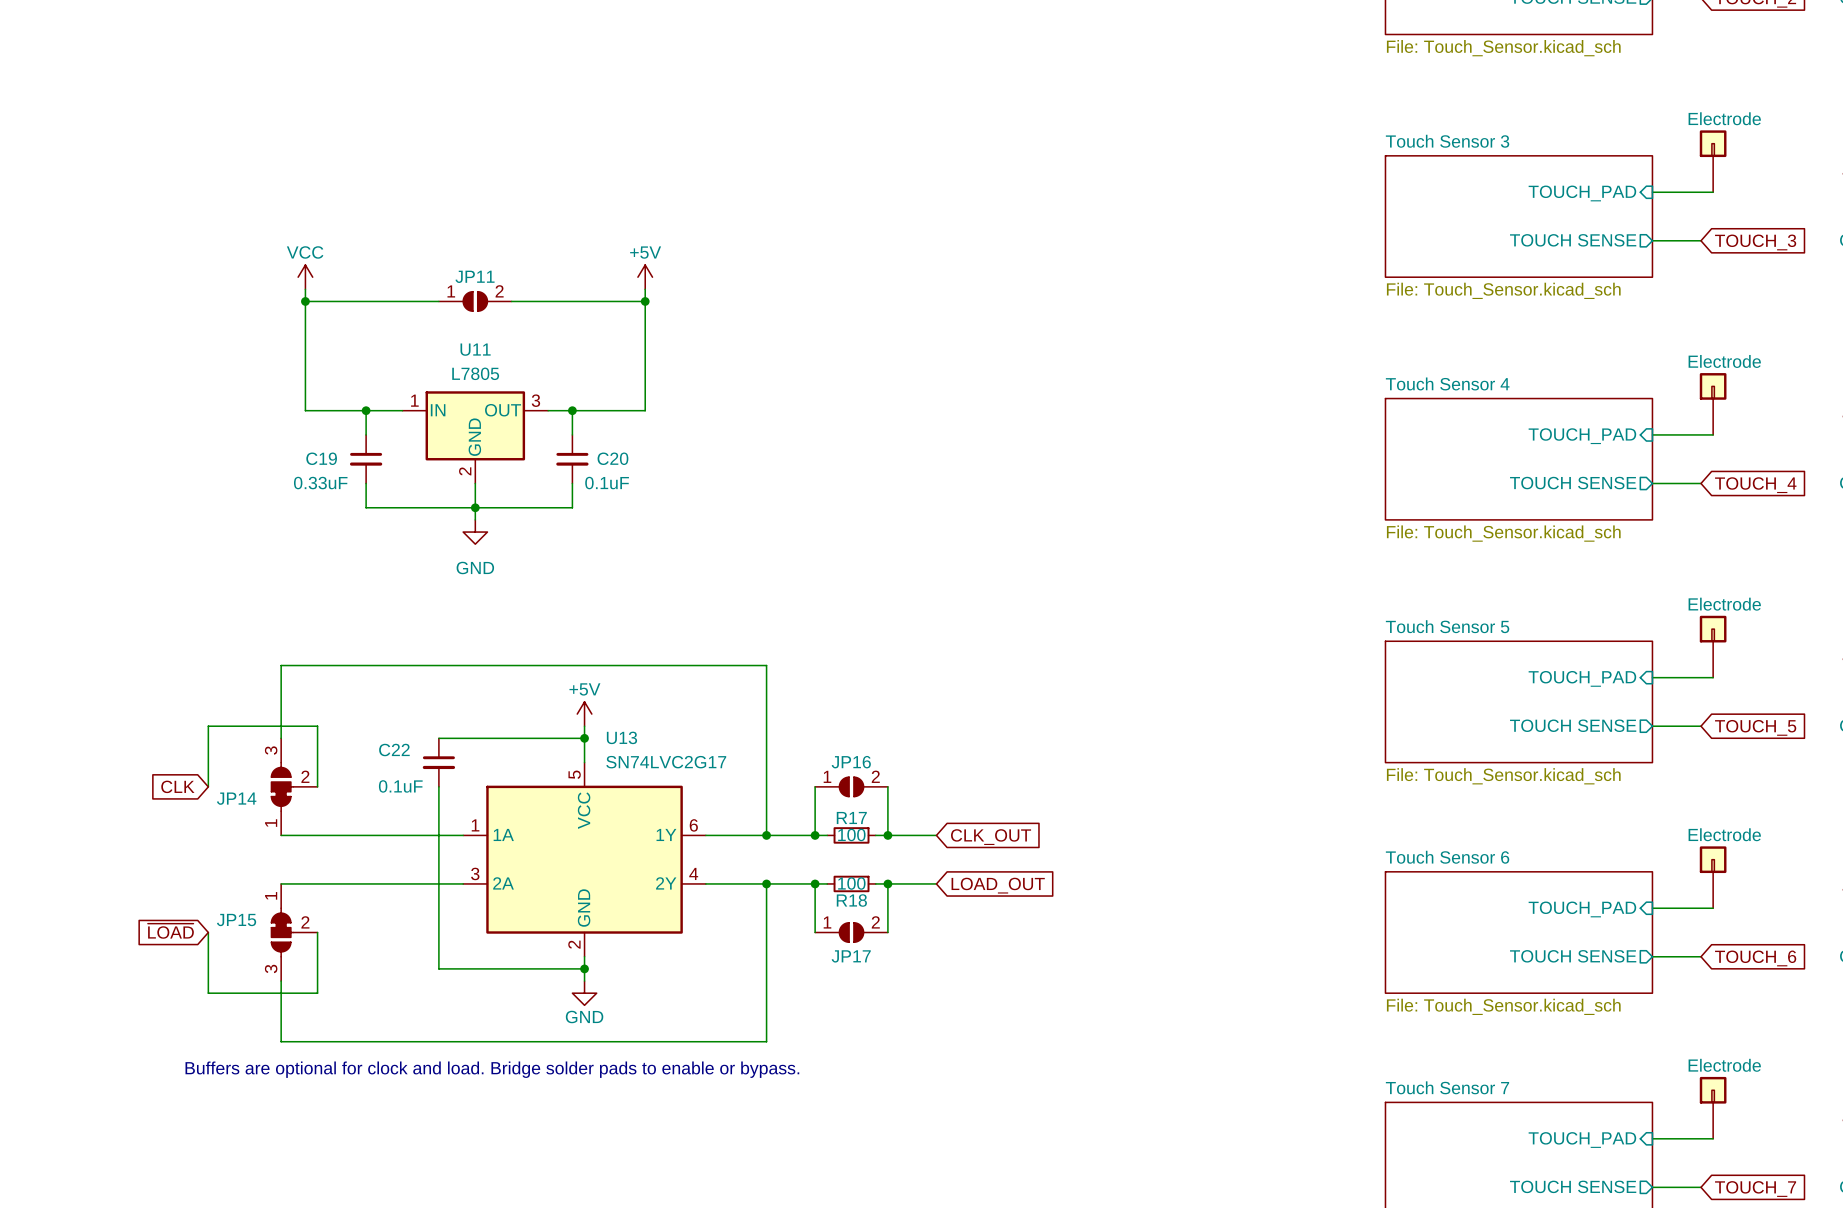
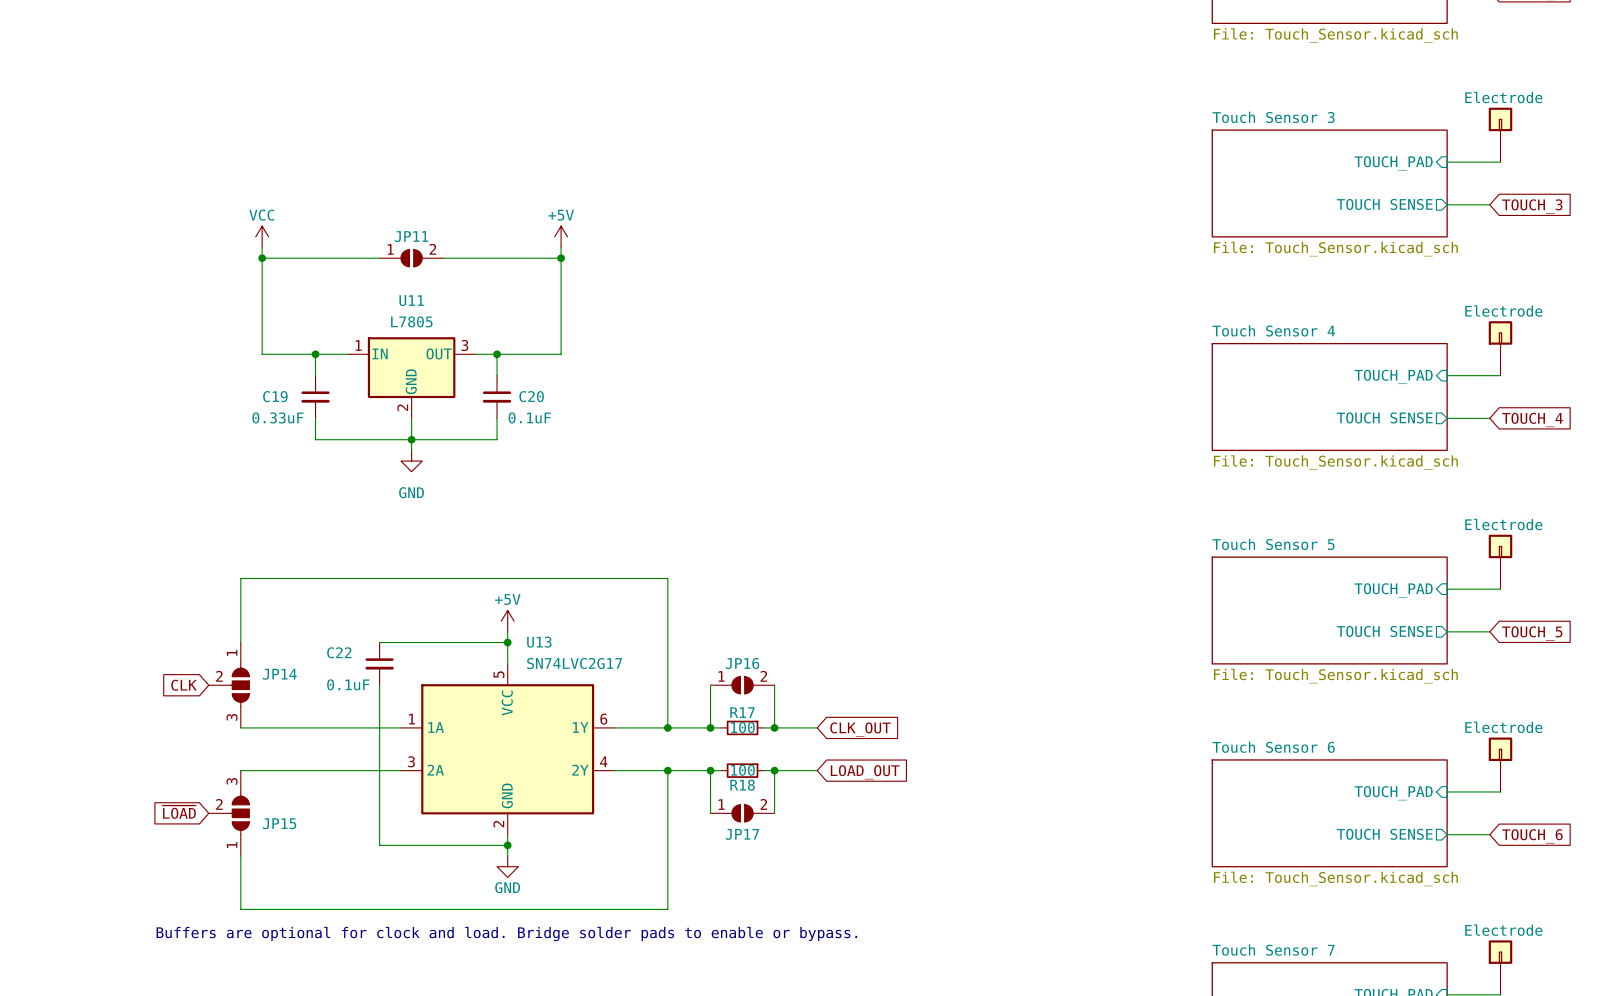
JP14 symbol: [271, 738, 318, 836] -> [208, 642, 250, 728]
global label position: CLK (177, 786) -> CLK (184, 685)
wire: (208, 786) (208, 726) (317, 726) (317, 786) -> none
JP14 name position: JP14 (236, 798) -> JP14 (279, 674)
JP15 symbol: [271, 883, 318, 982] -> [208, 770, 250, 857]
JP15 name position: JP15 (236, 920) -> JP15 (279, 823)
global label position: ~{LOAD} (170, 931) -> ~{LOAD} (179, 812)
wire: (208, 932) (208, 993) (317, 993) (317, 932) -> none

